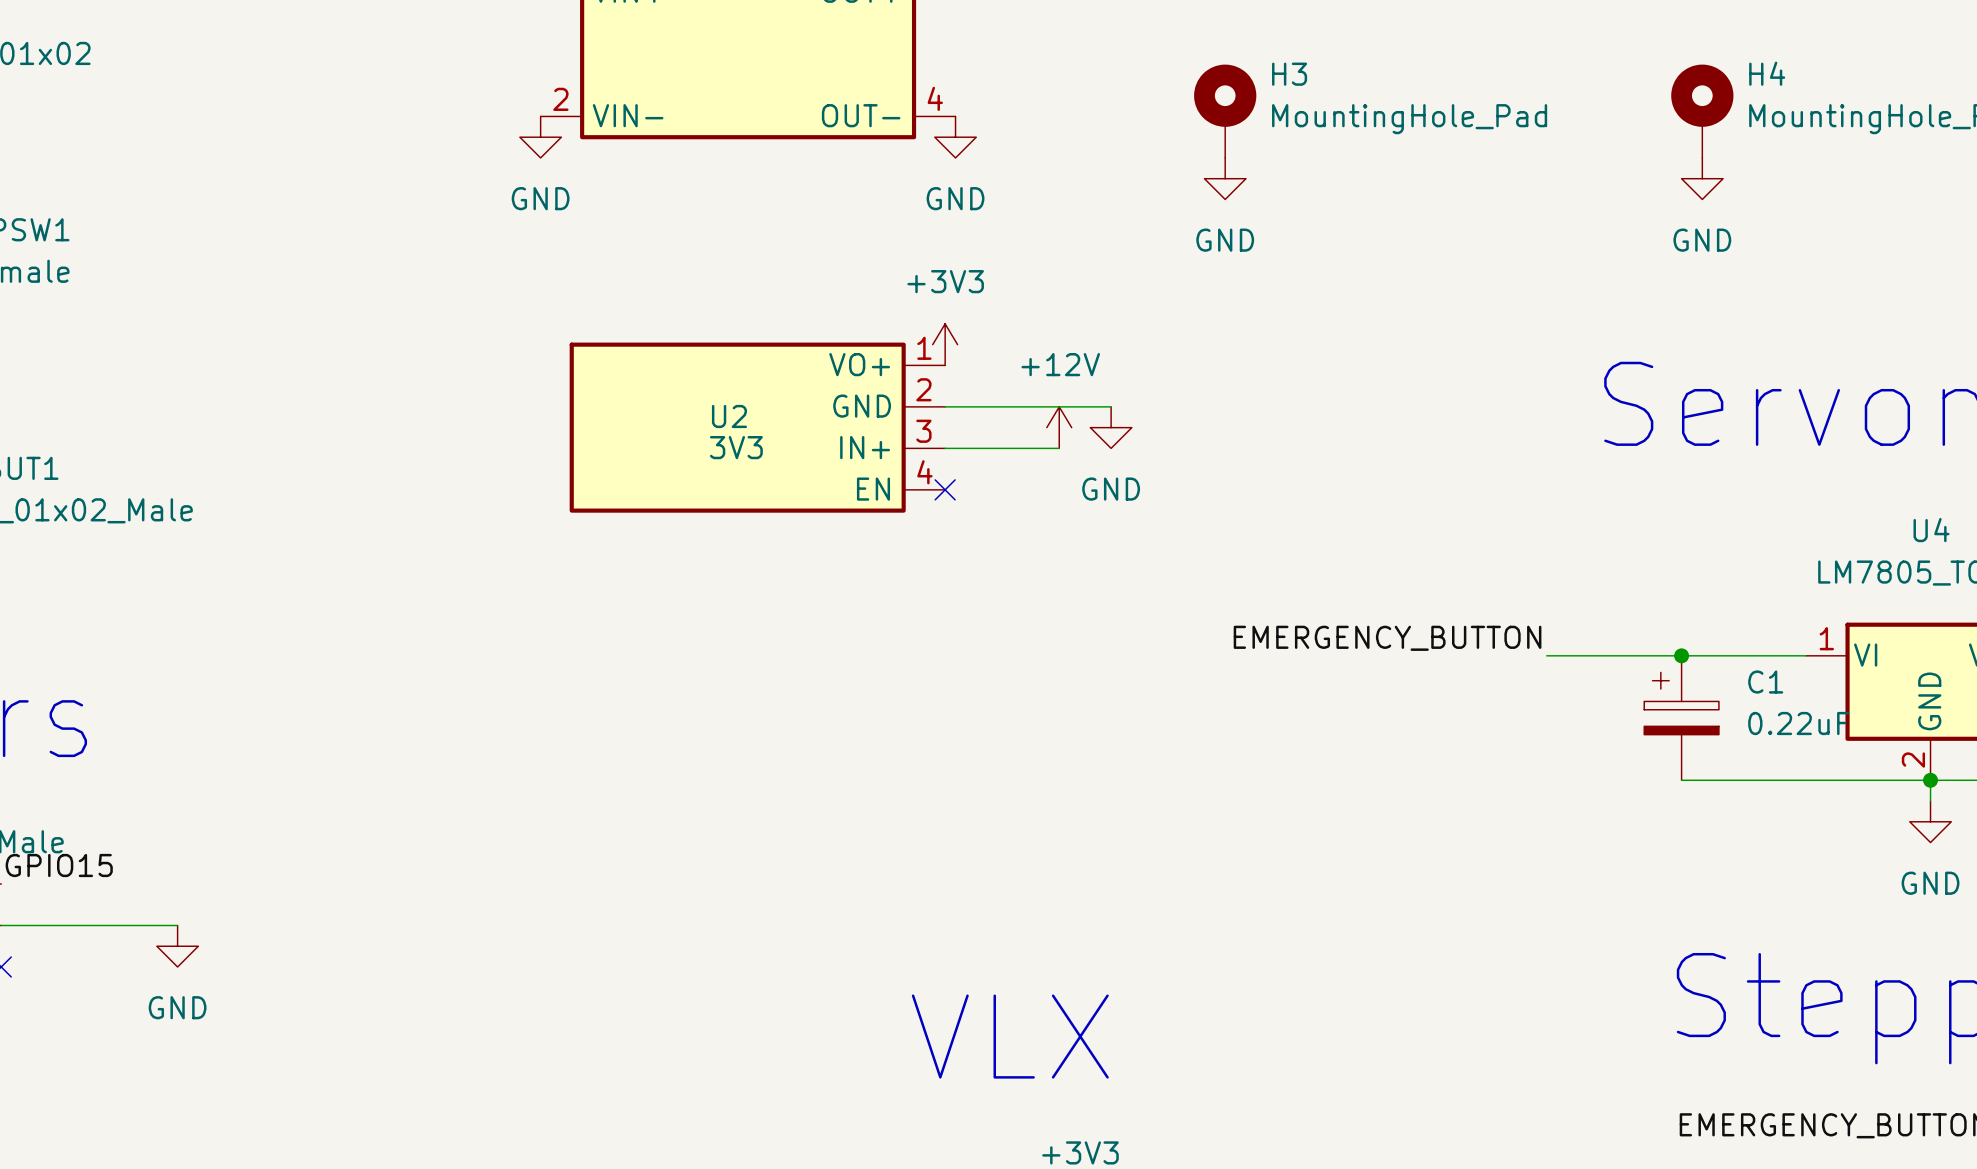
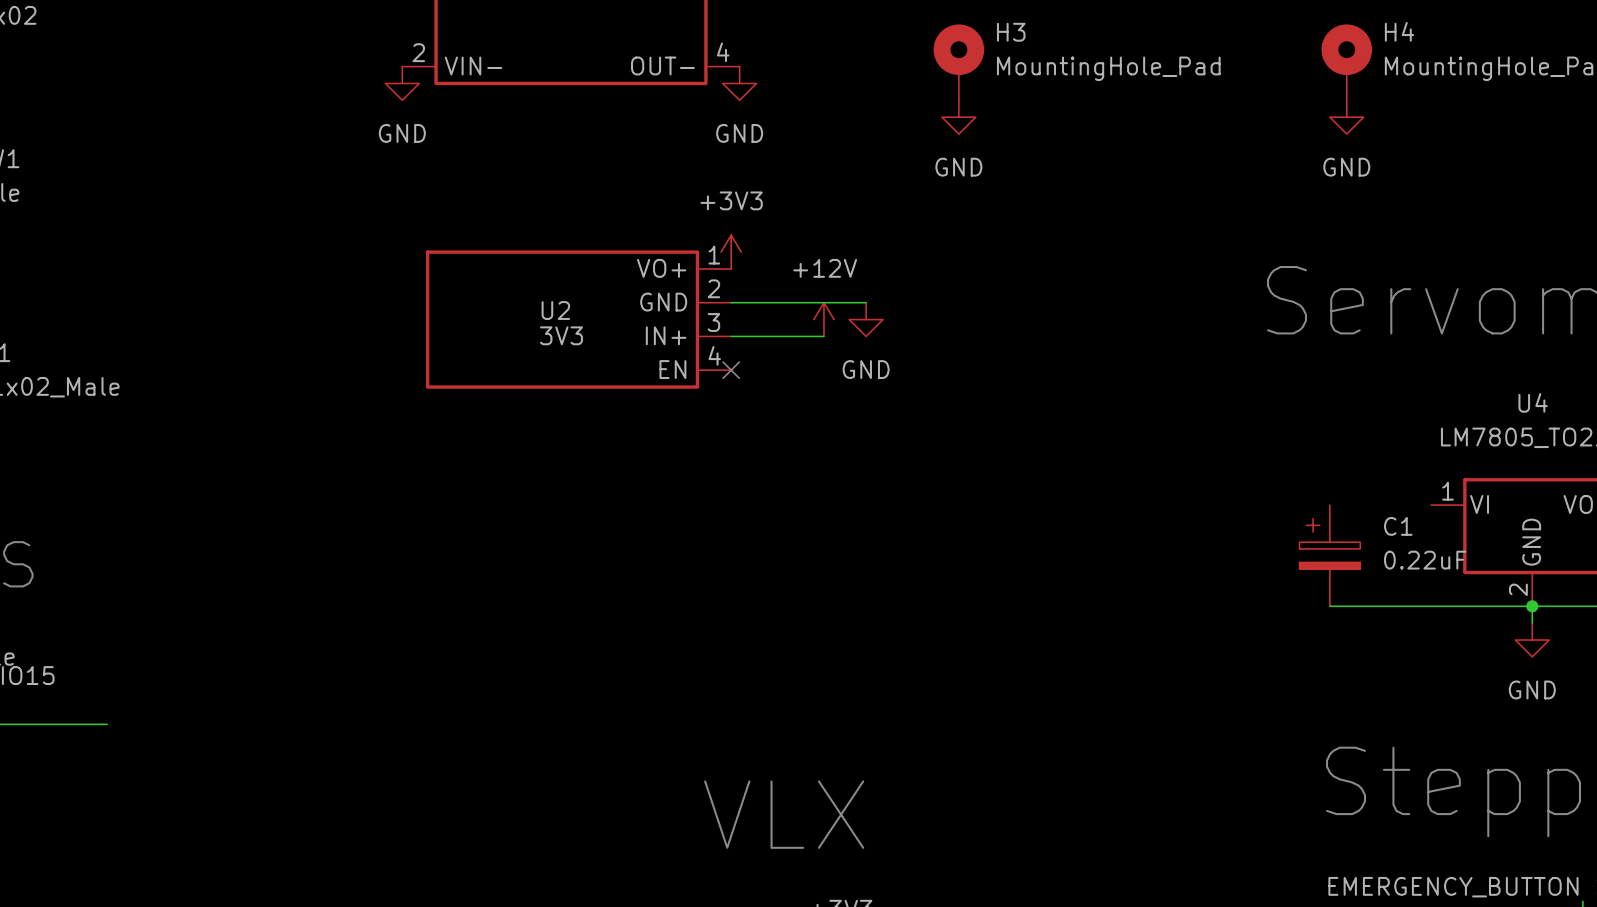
label: EMERGENCY_BUTTON (1387, 638) -> none
wire: (1546, 655) (1806, 655) -> none
junction: (1681, 655) -> none
power symbol: GND (177, 946) -> none

